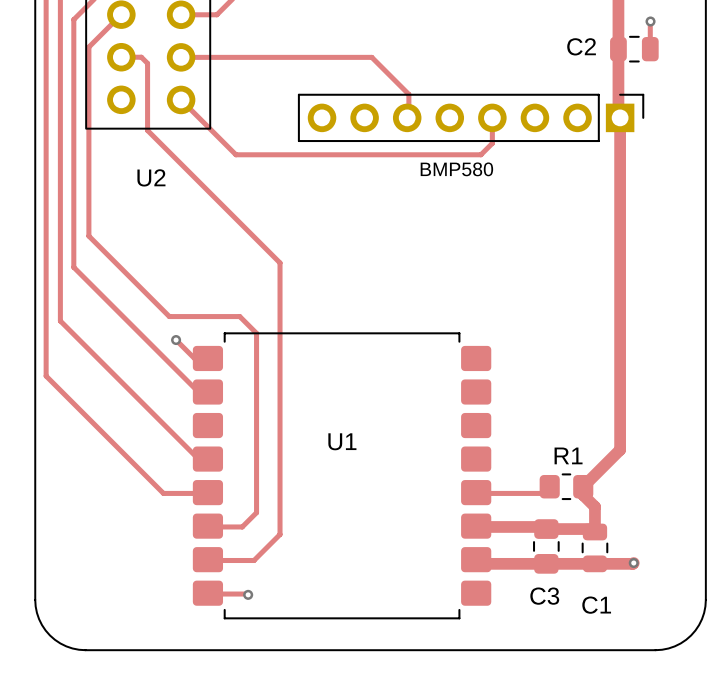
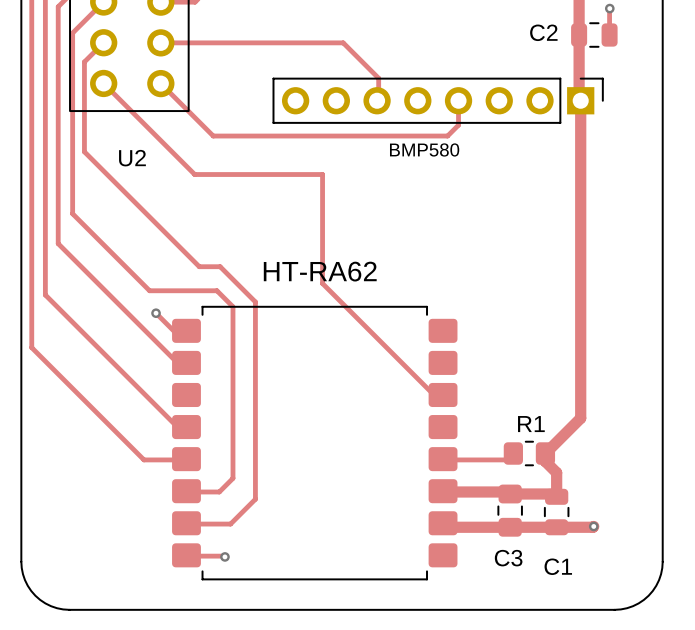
track: (121, 57) (141, 57) (147, 63) (147, 130) (280, 262) (280, 328) -> (103, 42) (84, 61) (84, 151) (199, 266) (220, 266) (255, 301)
track: none -> (103, 83) (194, 174) (322, 174) (322, 283) (434, 395)
U1 name: U1 (342, 441) -> HT-RA62 (320, 271)

